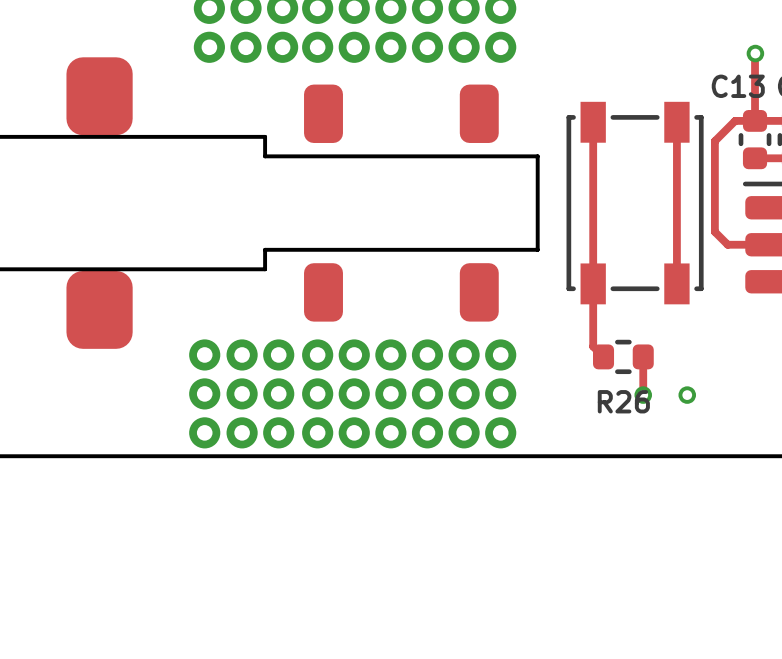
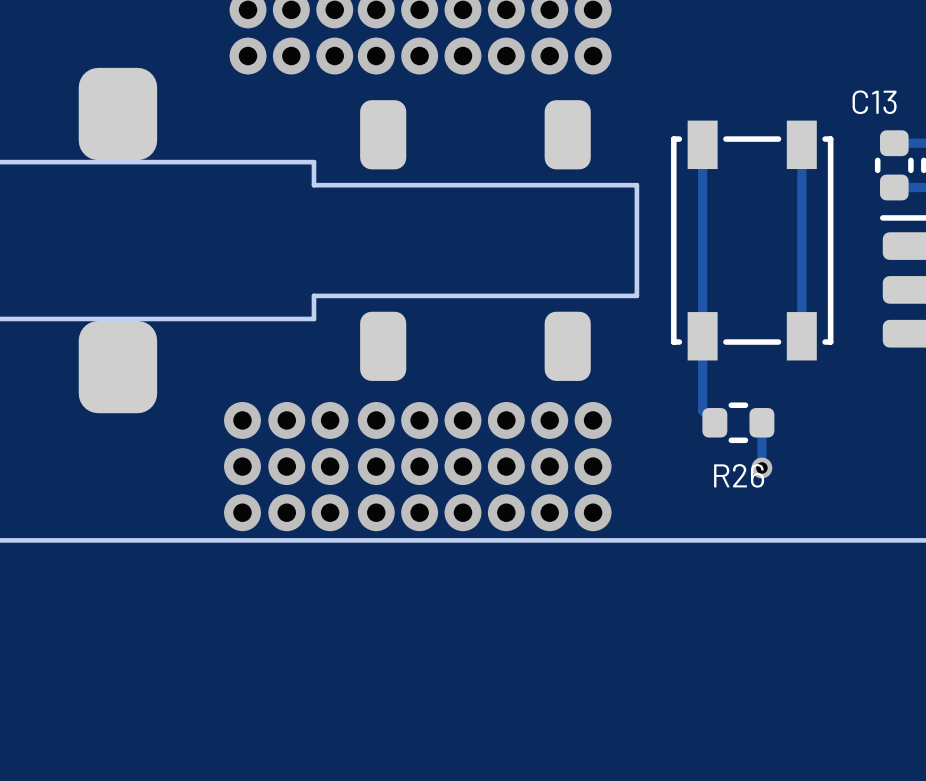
track: (755, 53) (755, 120) (735, 120) (714, 141) (714, 231) (727, 244) (771, 244) -> none
via: (755, 53) -> none
via: (687, 395) -> none

